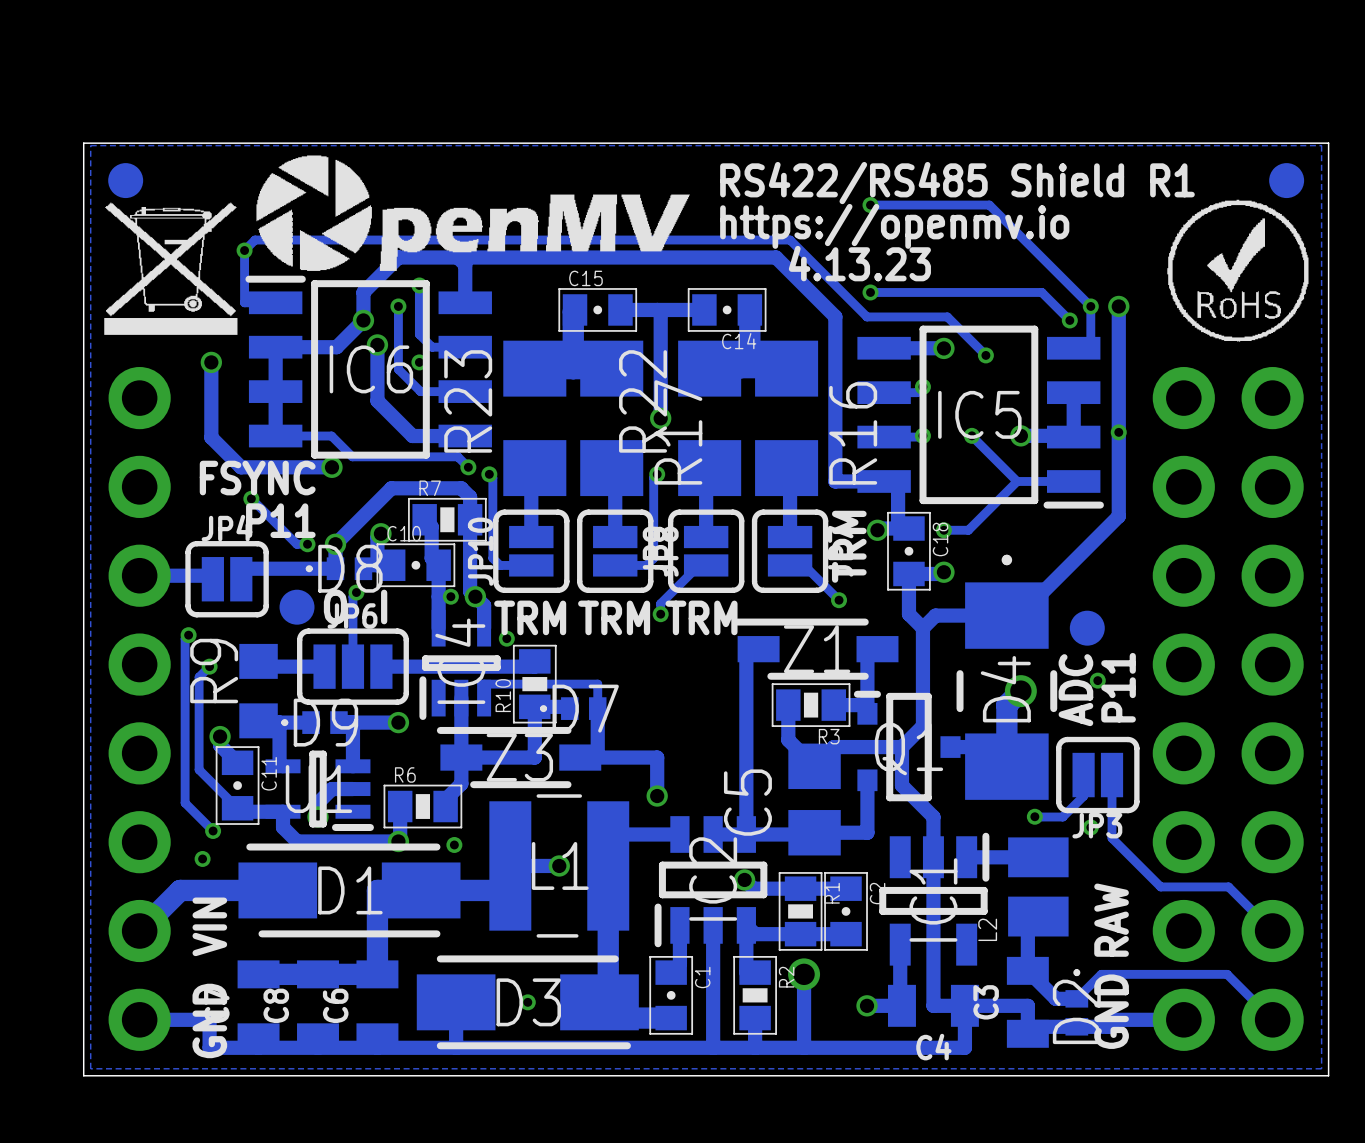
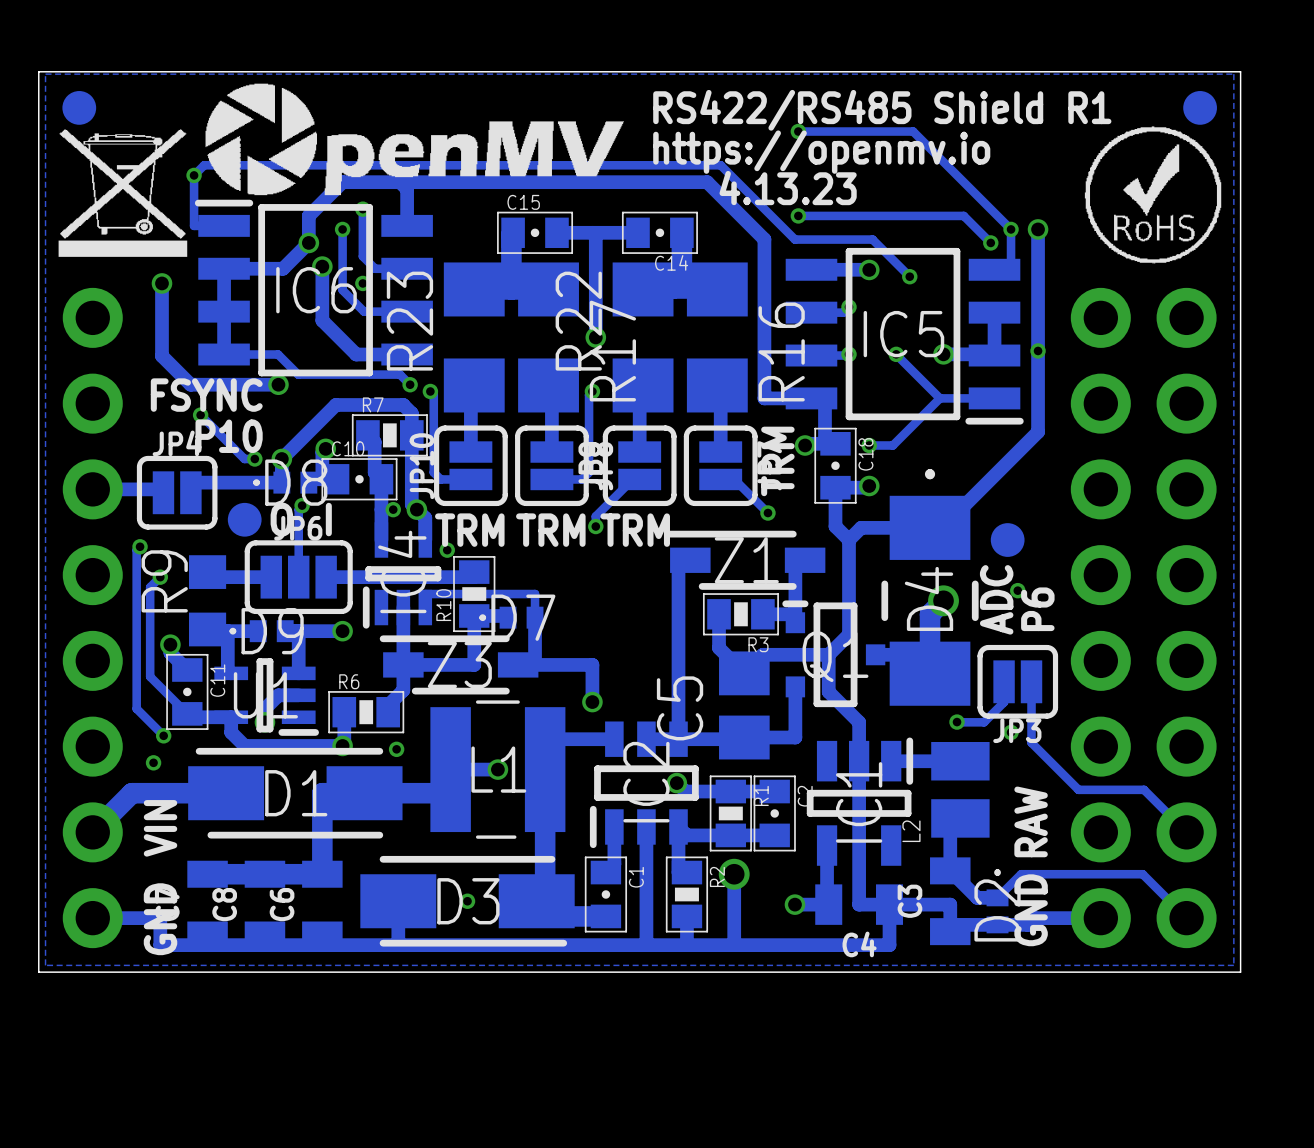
text: P11 (280, 520) -> P10 (229, 436)
text: P11 (1118, 687) -> P6 (1037, 609)

